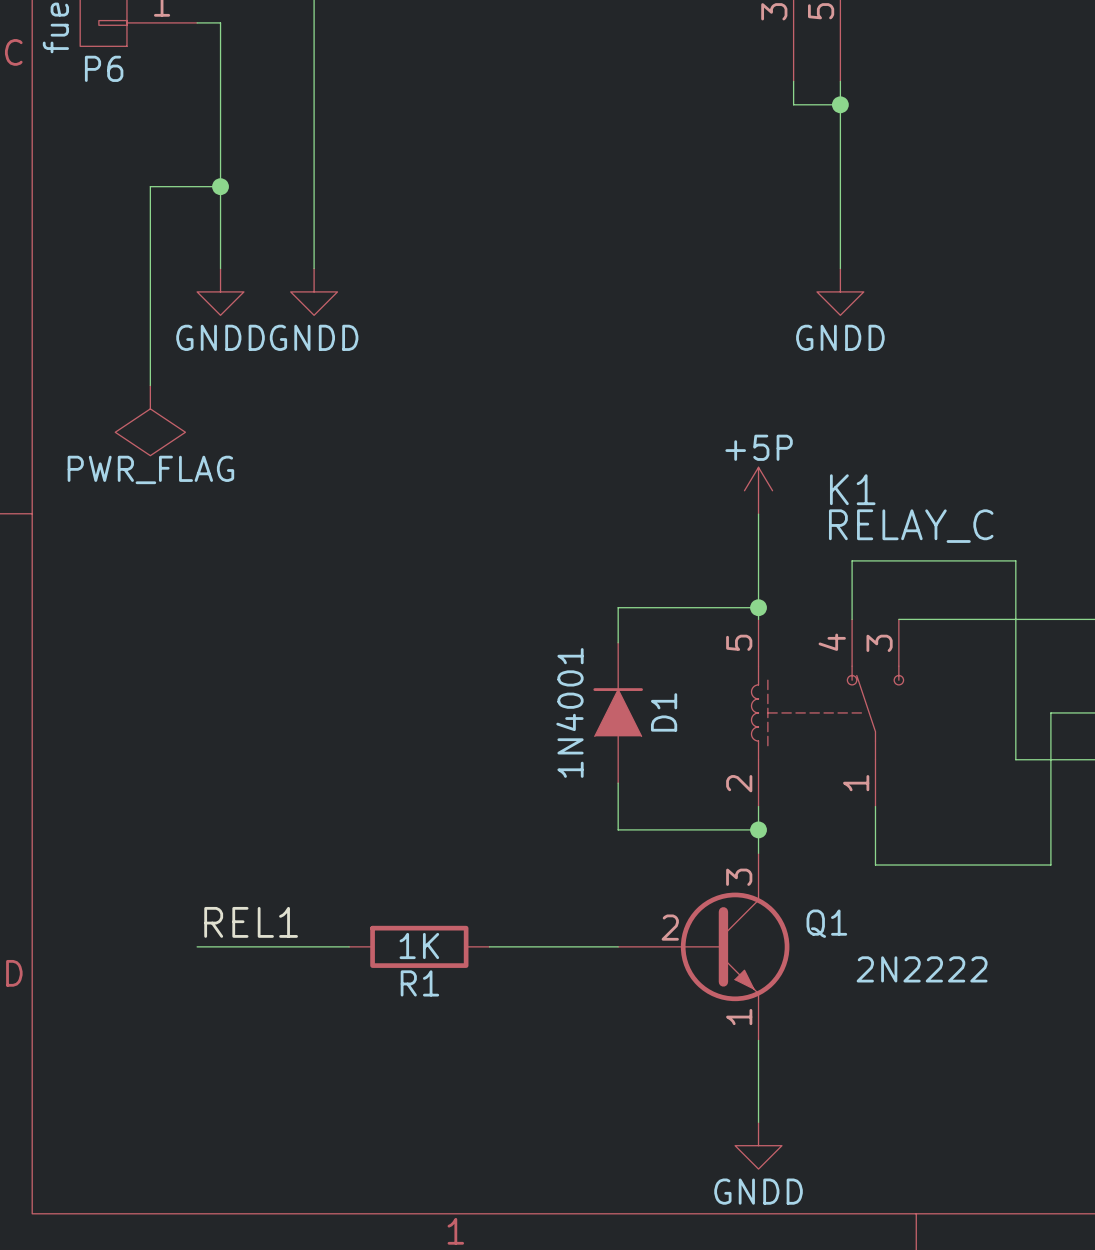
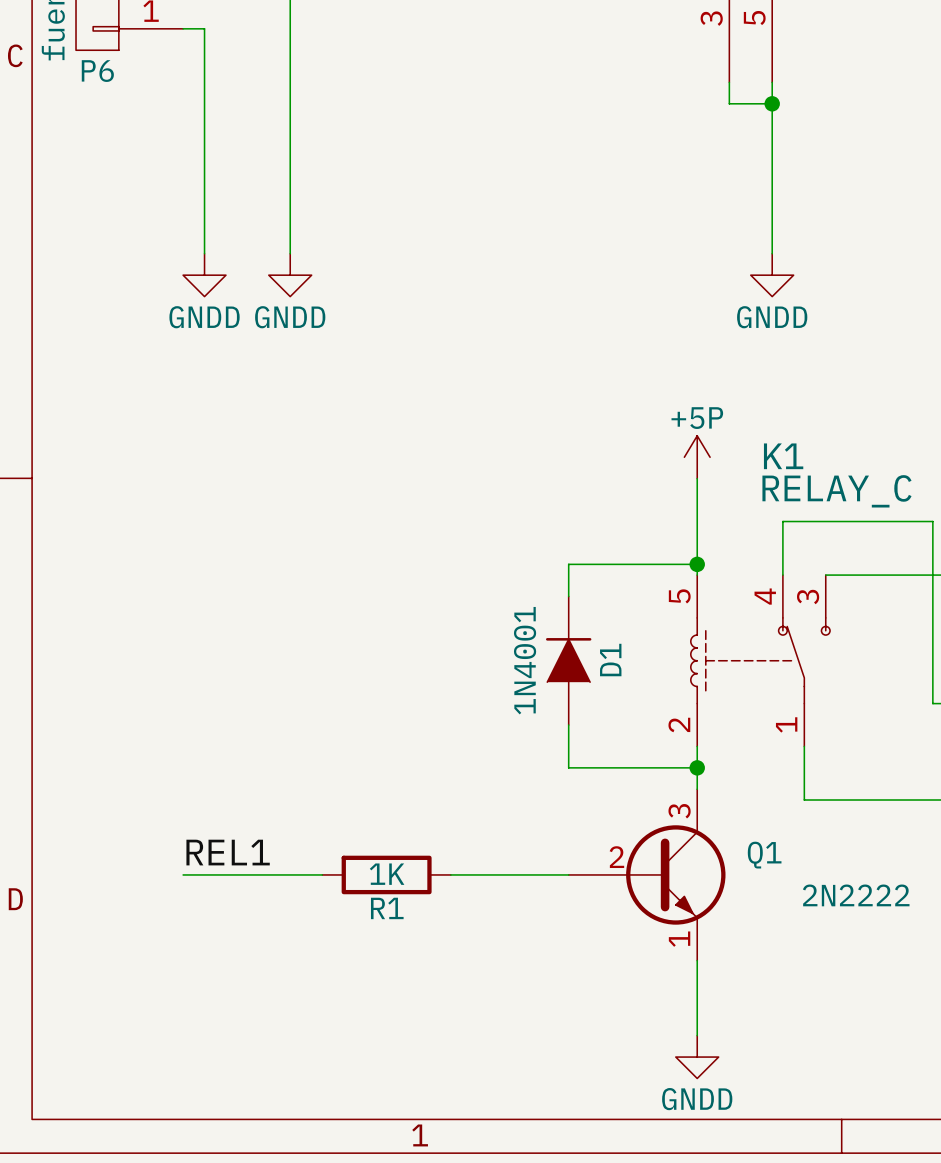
wire: (220, 186) (150, 186) (150, 385) -> none
junction: (220, 186) -> none
power symbol: PWR_FLAG (150, 420) -> none

